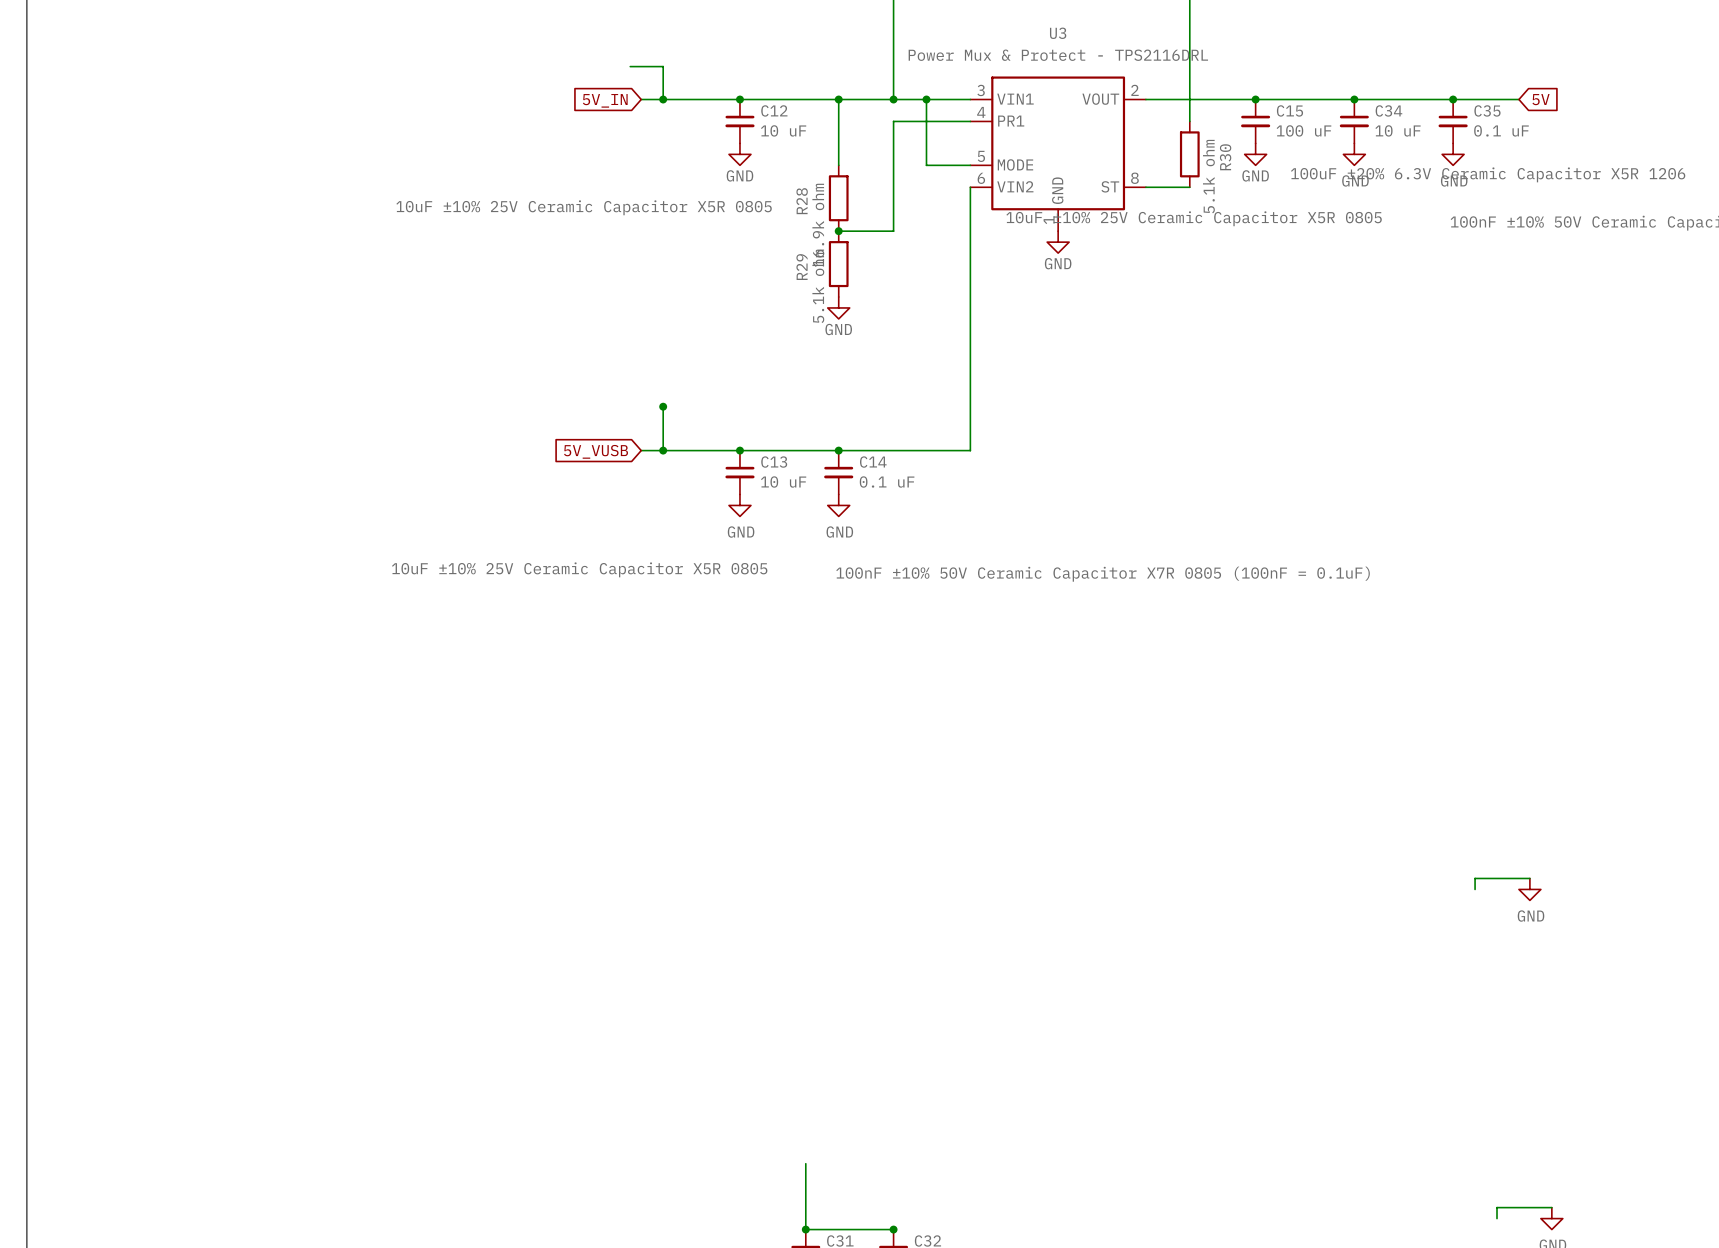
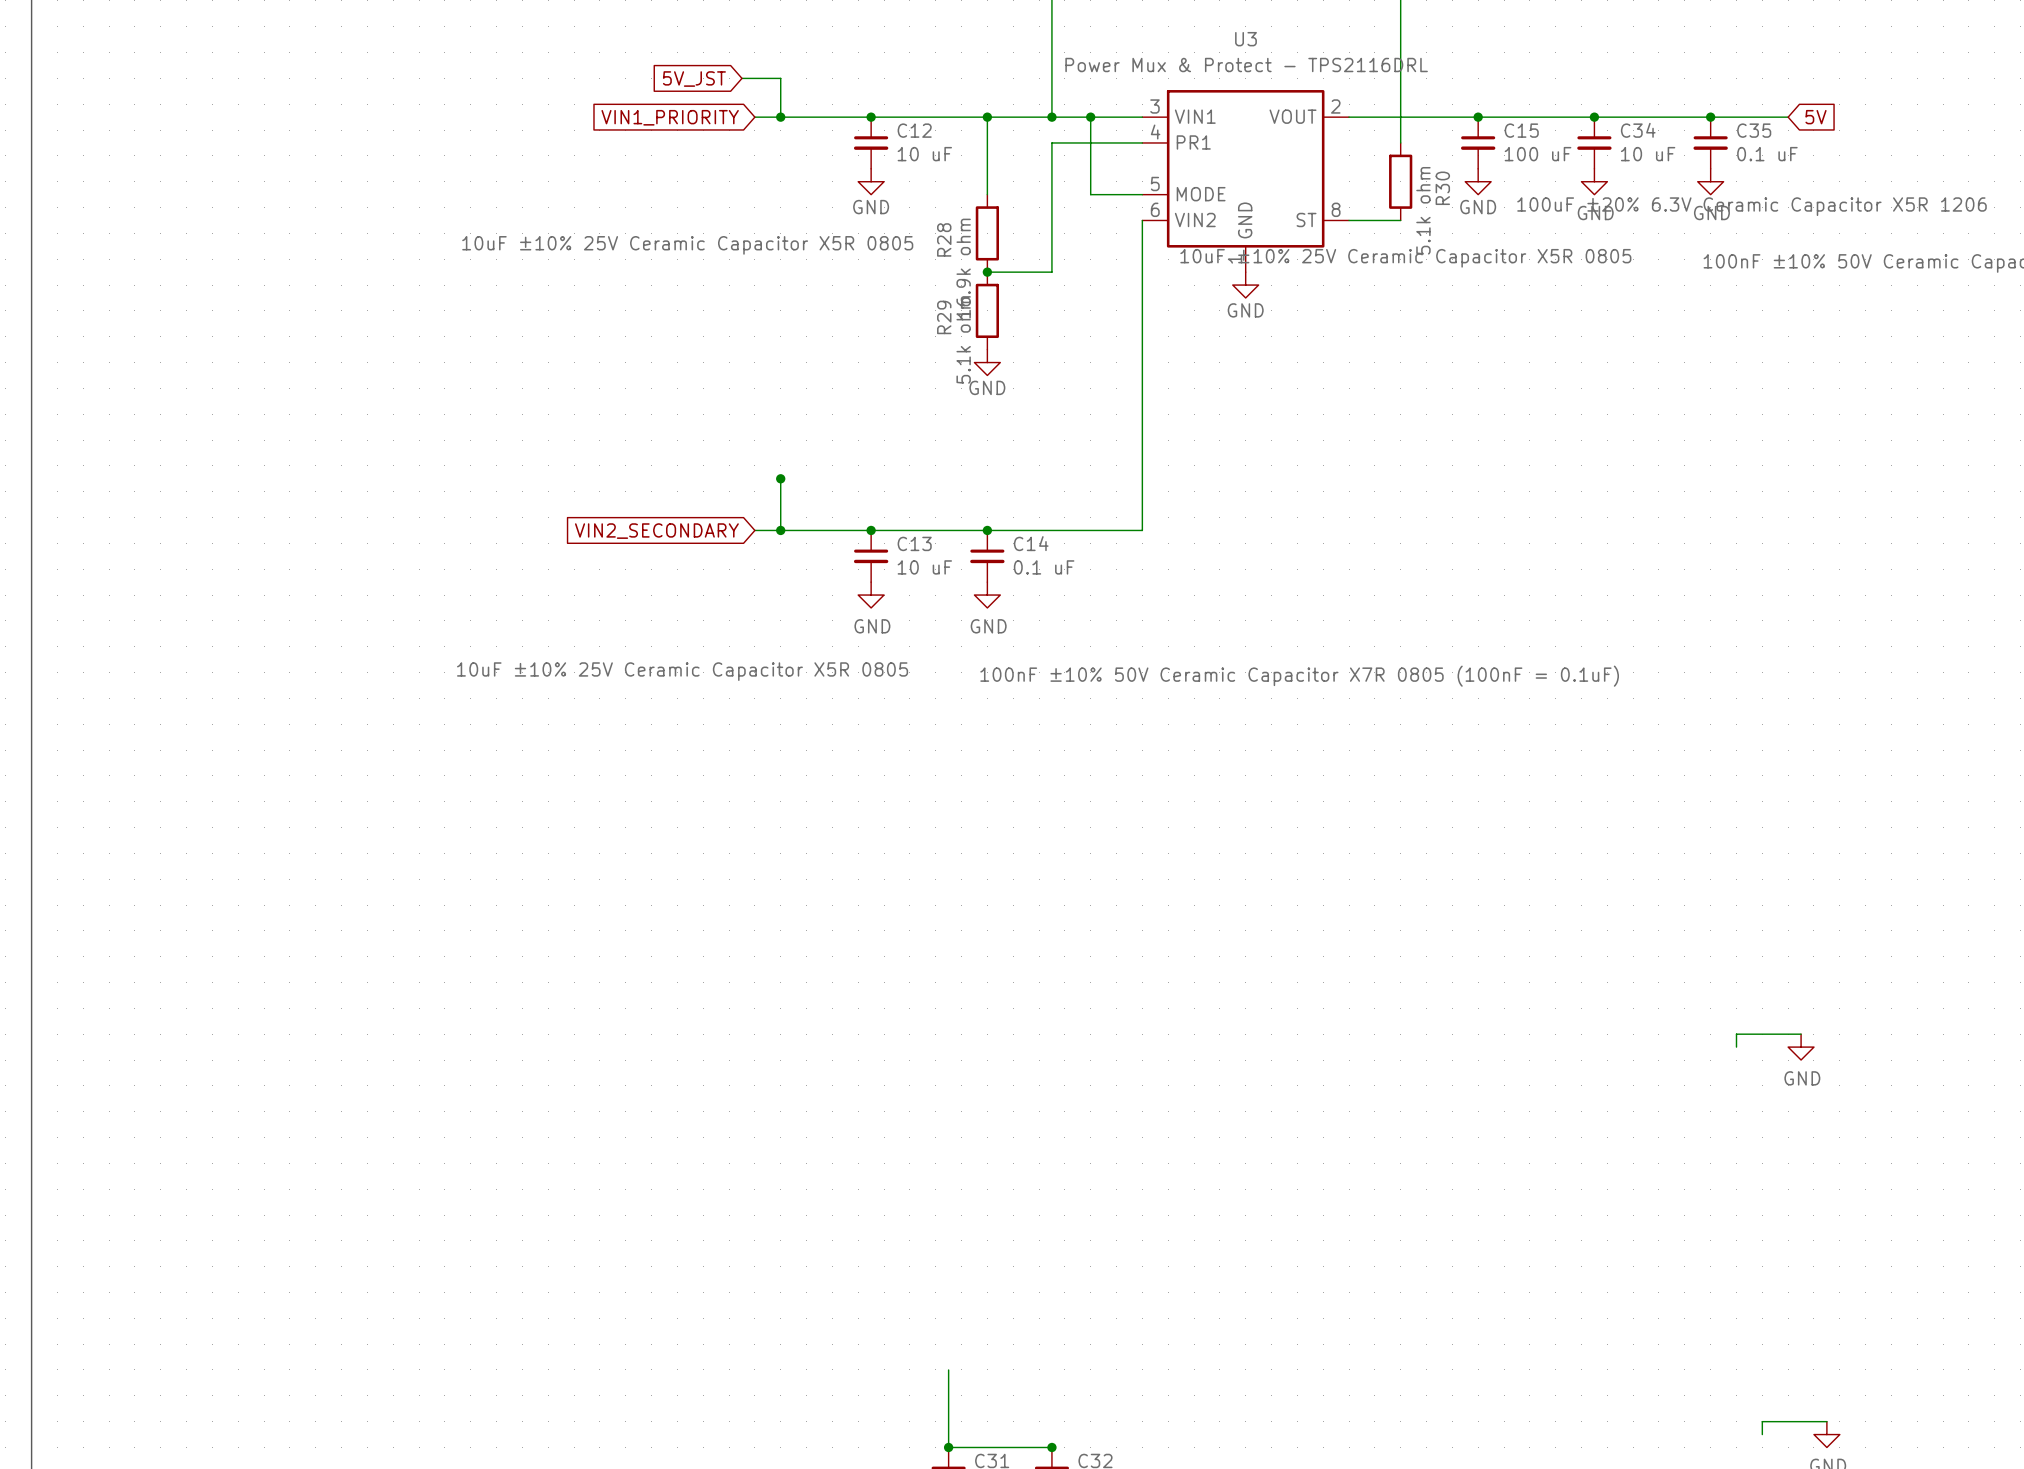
global label: none -> 5V_JST (694, 79)
global label: 5V_IN (605, 100) -> VIN1_PRIORITY (670, 117)
global label: 5V_VUSB (596, 451) -> VIN2_SECONDARY (656, 531)

